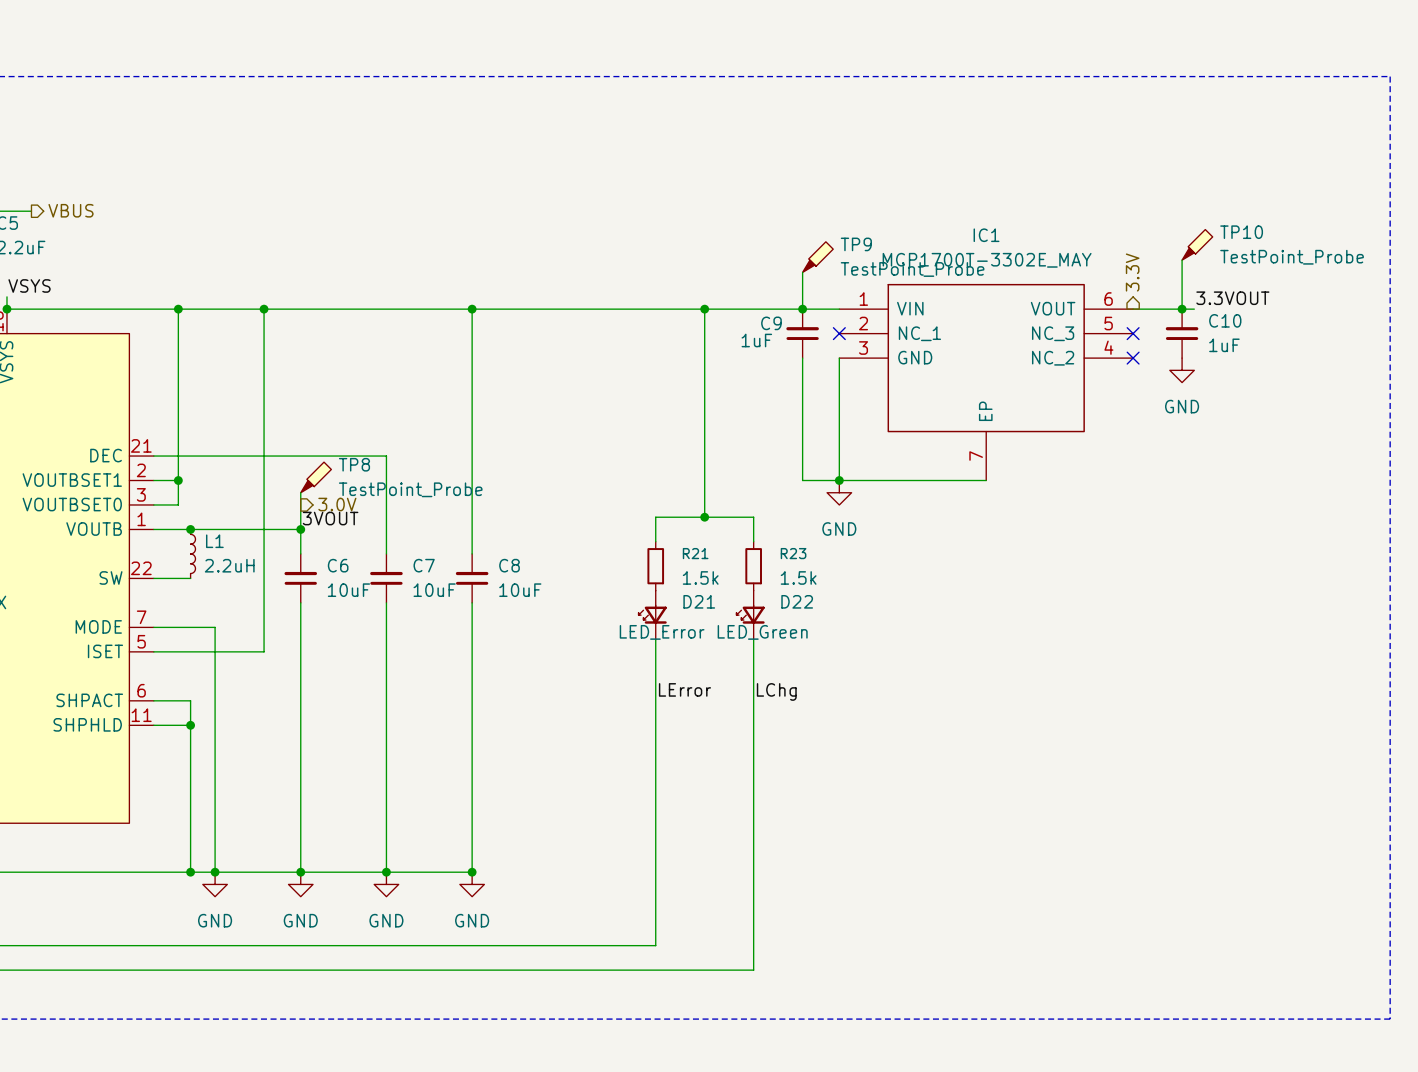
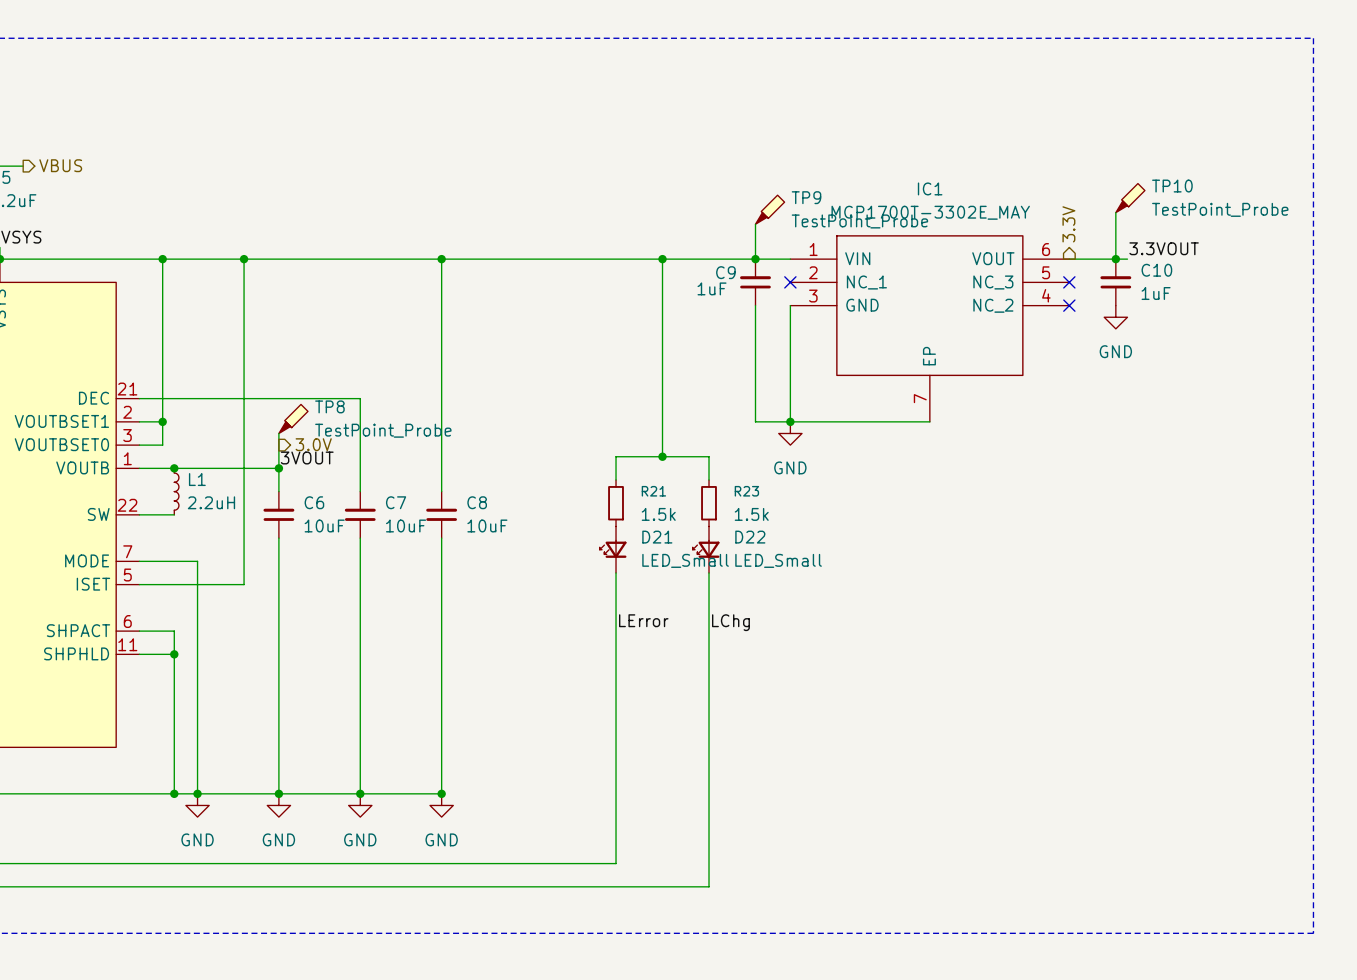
D21 value: LED_Error (662, 632) -> LED_Small (685, 560)
D22 value: LED_Green (762, 632) -> LED_Small (778, 560)

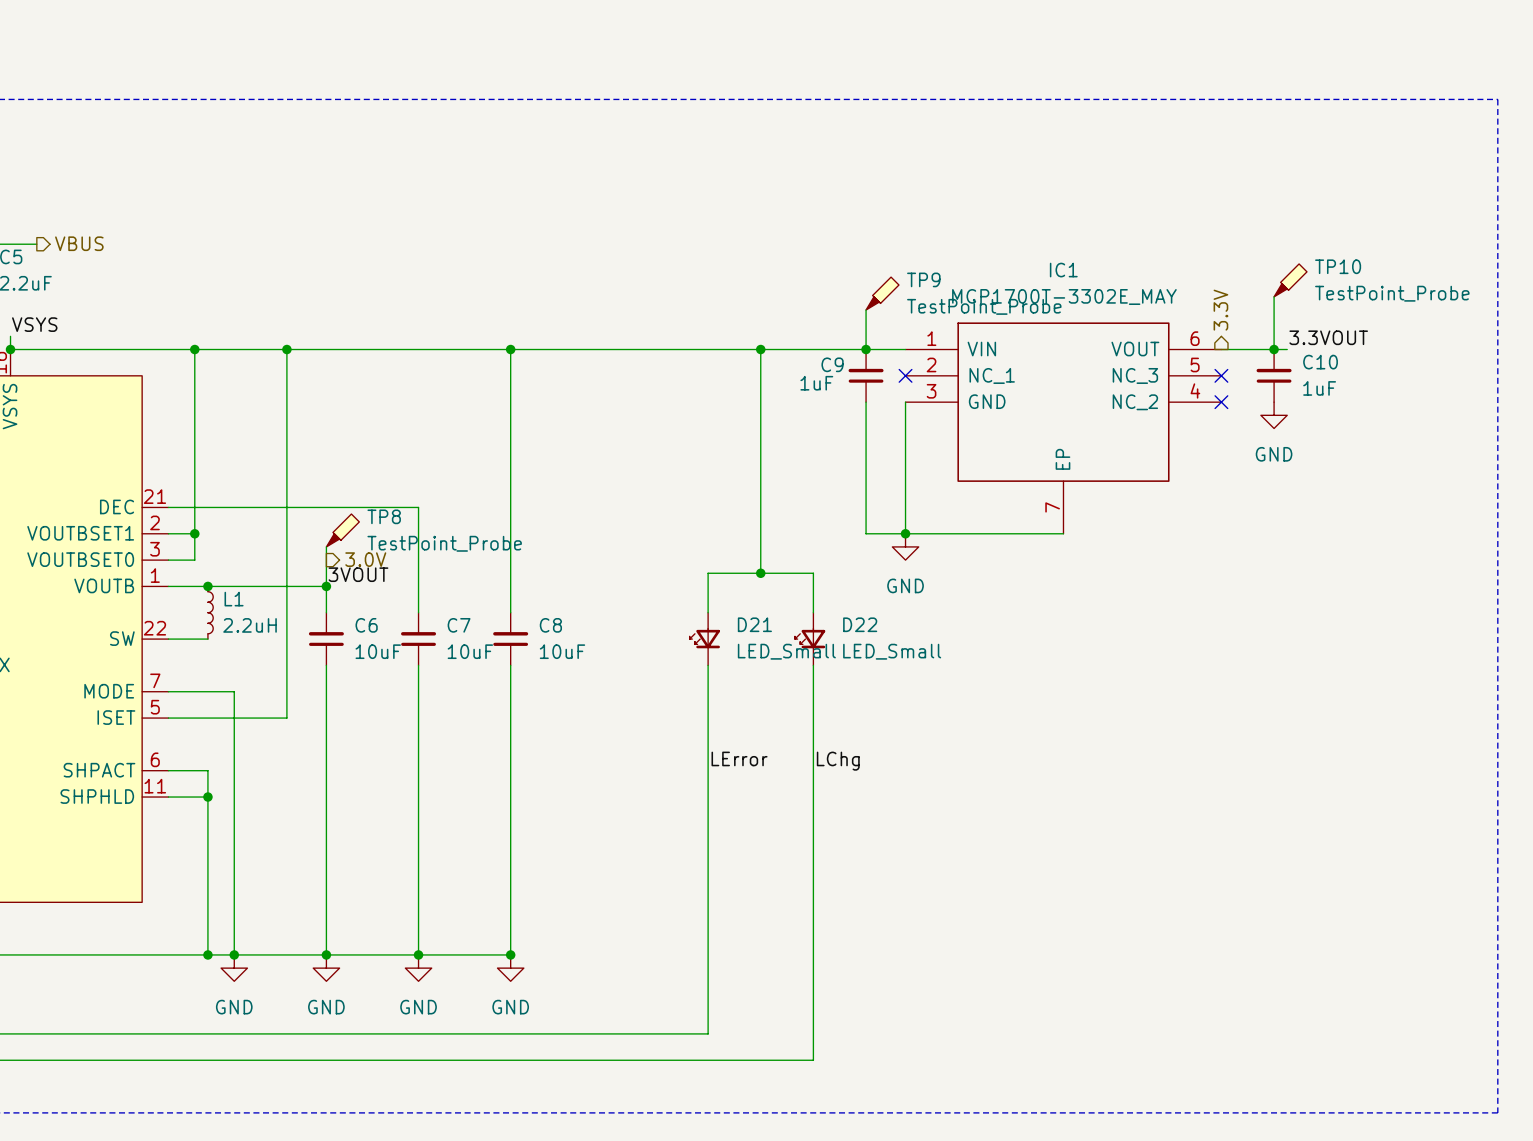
R21: 1.5k (616, 503) -> none
R23: 1.5k (709, 503) -> none
D21 position: (613, 549) -> (704, 639)
D22 position: (706, 549) -> (810, 639)

